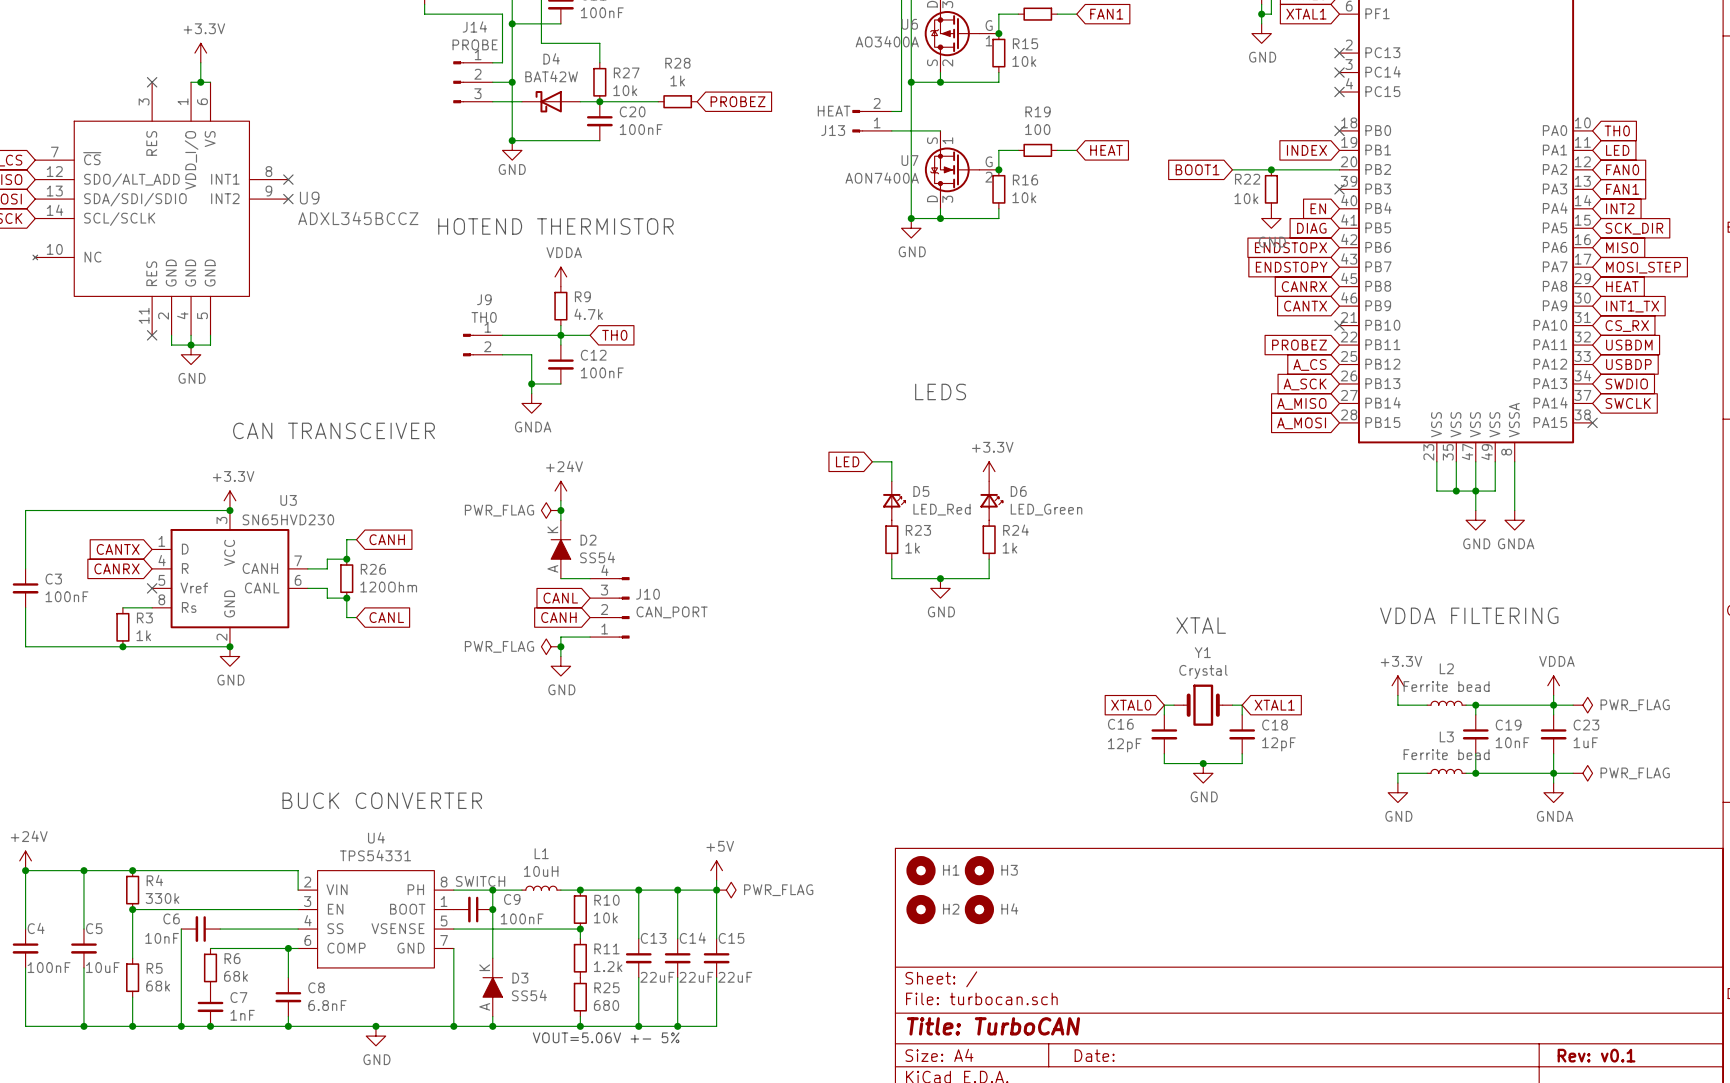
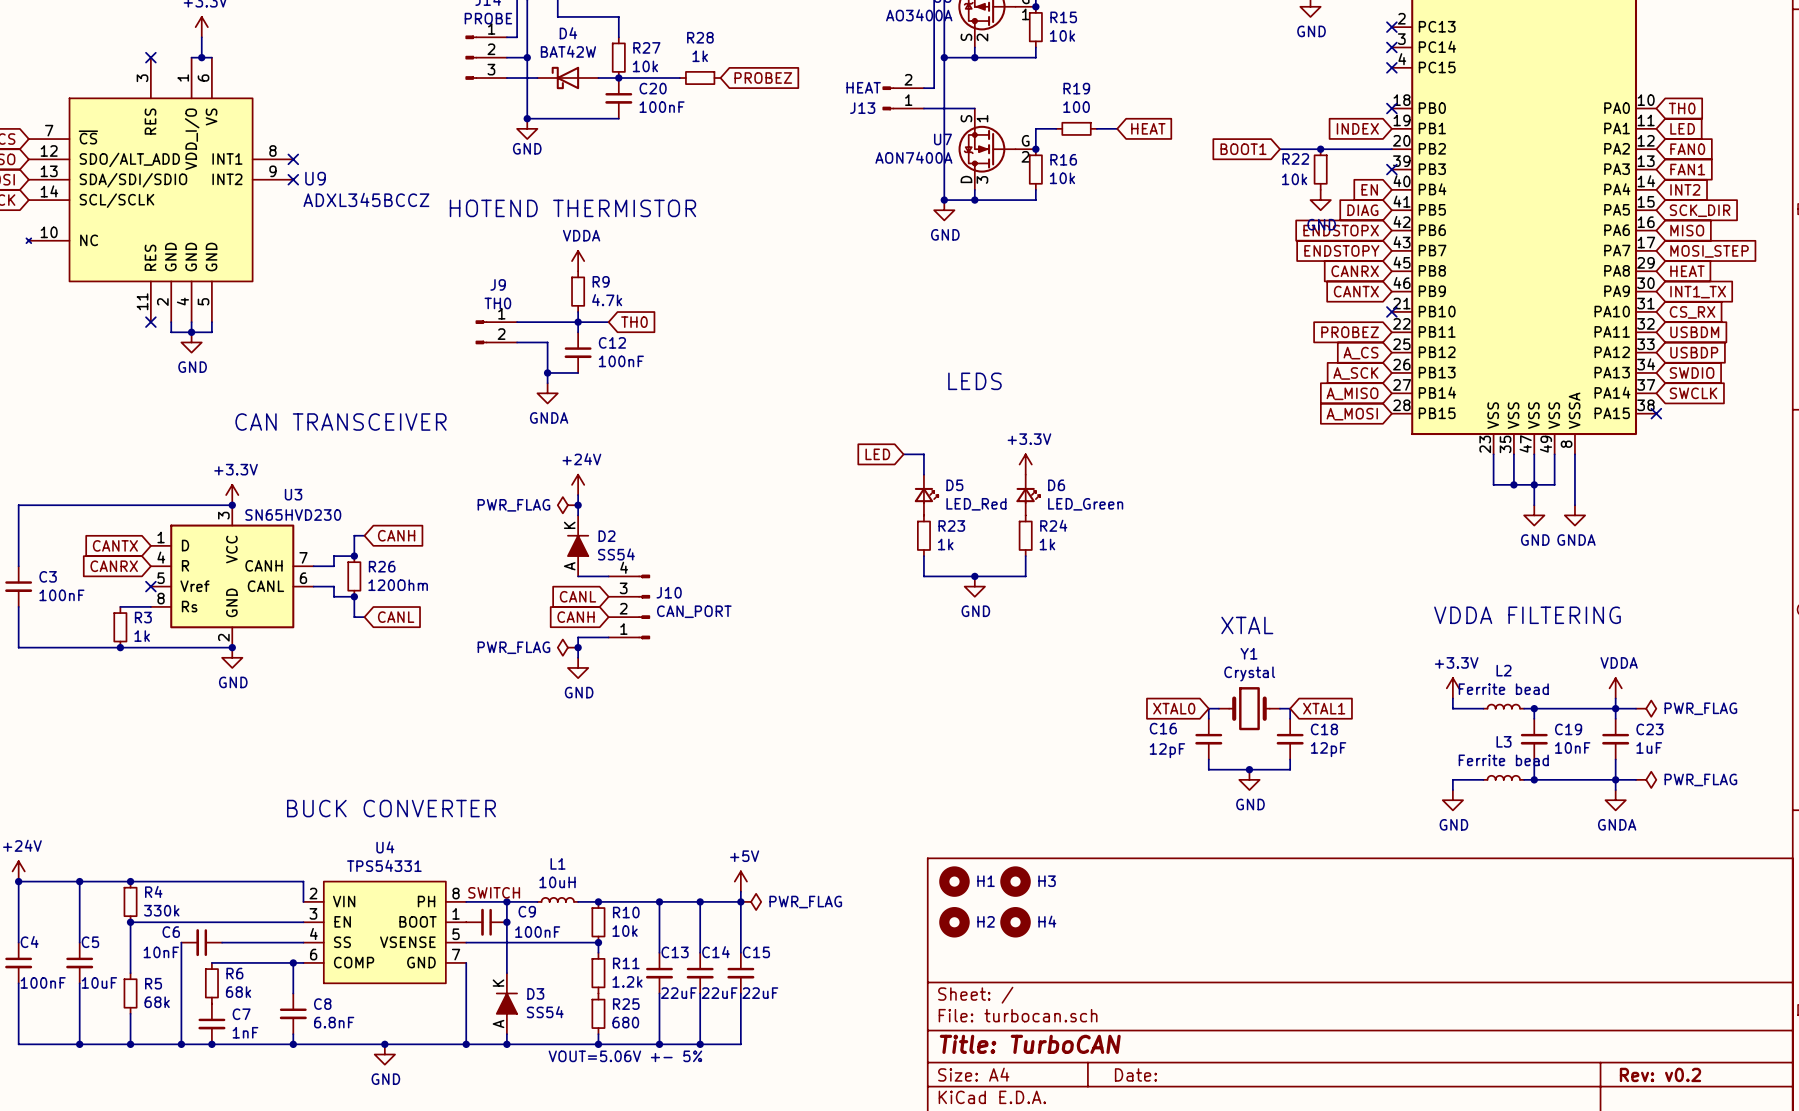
title block: Rev: v0.1 (1596, 1055) -> Rev: v0.2 (1660, 1074)

